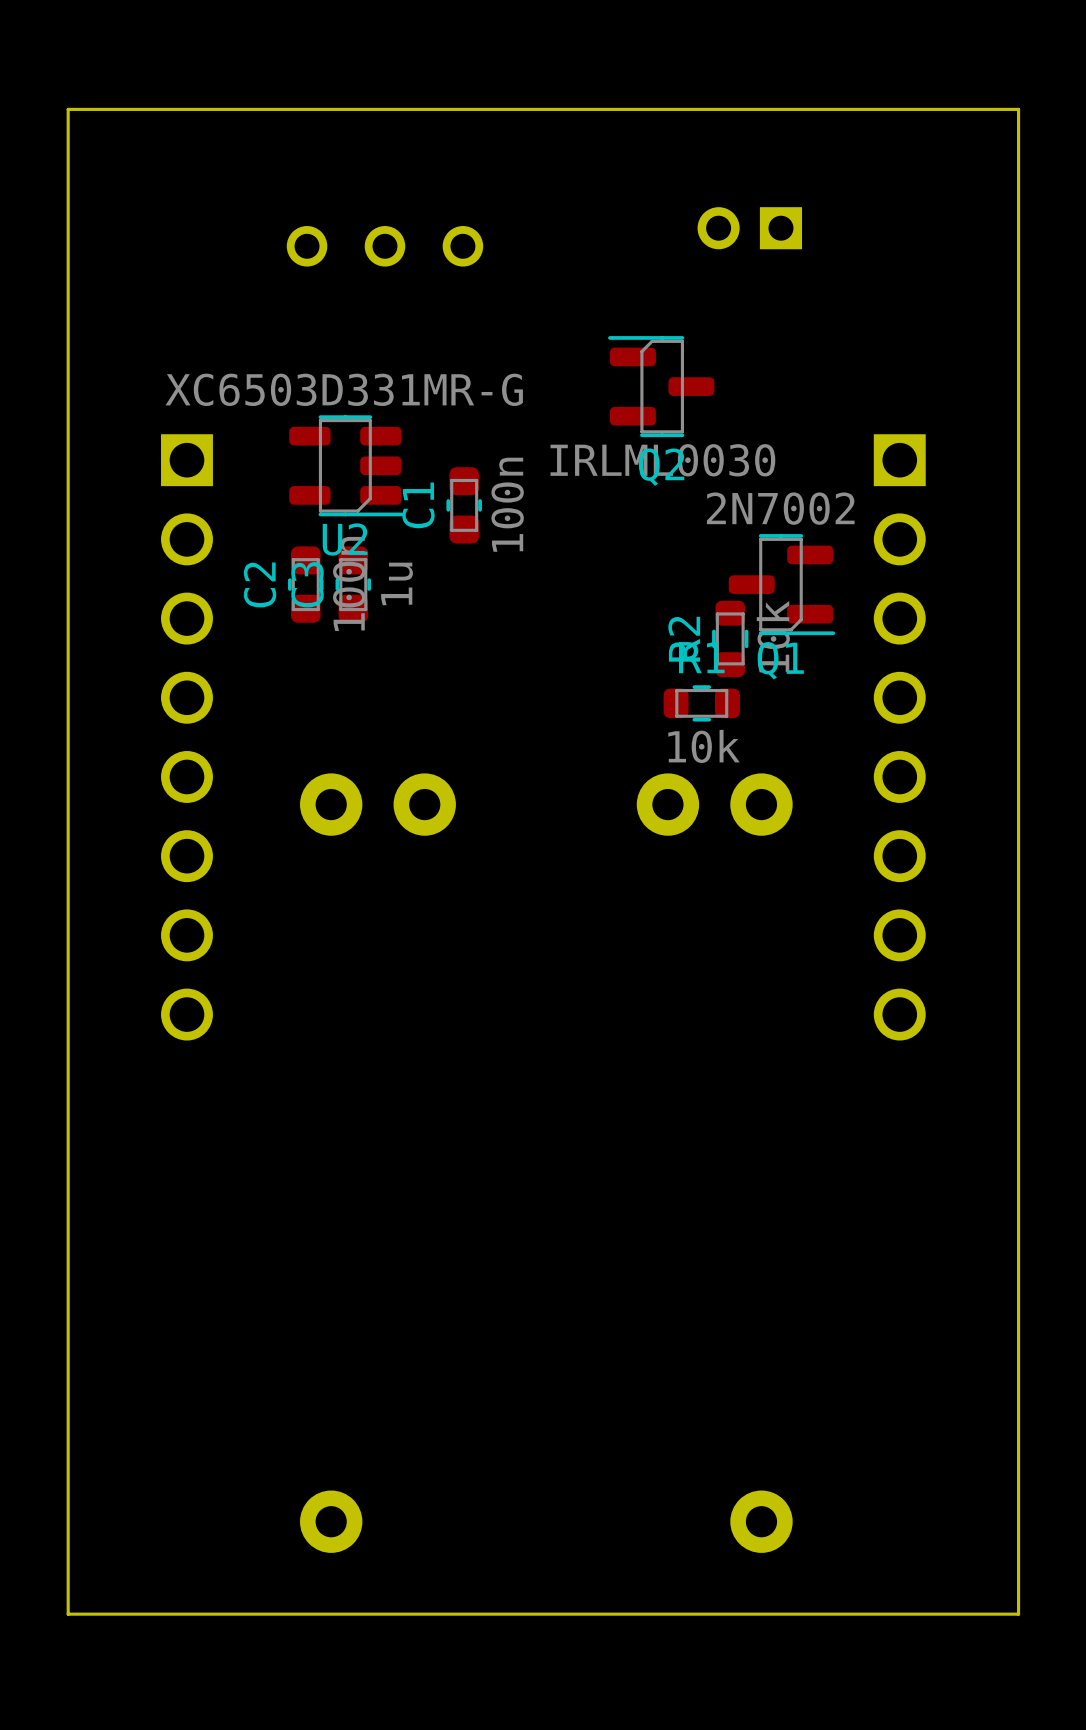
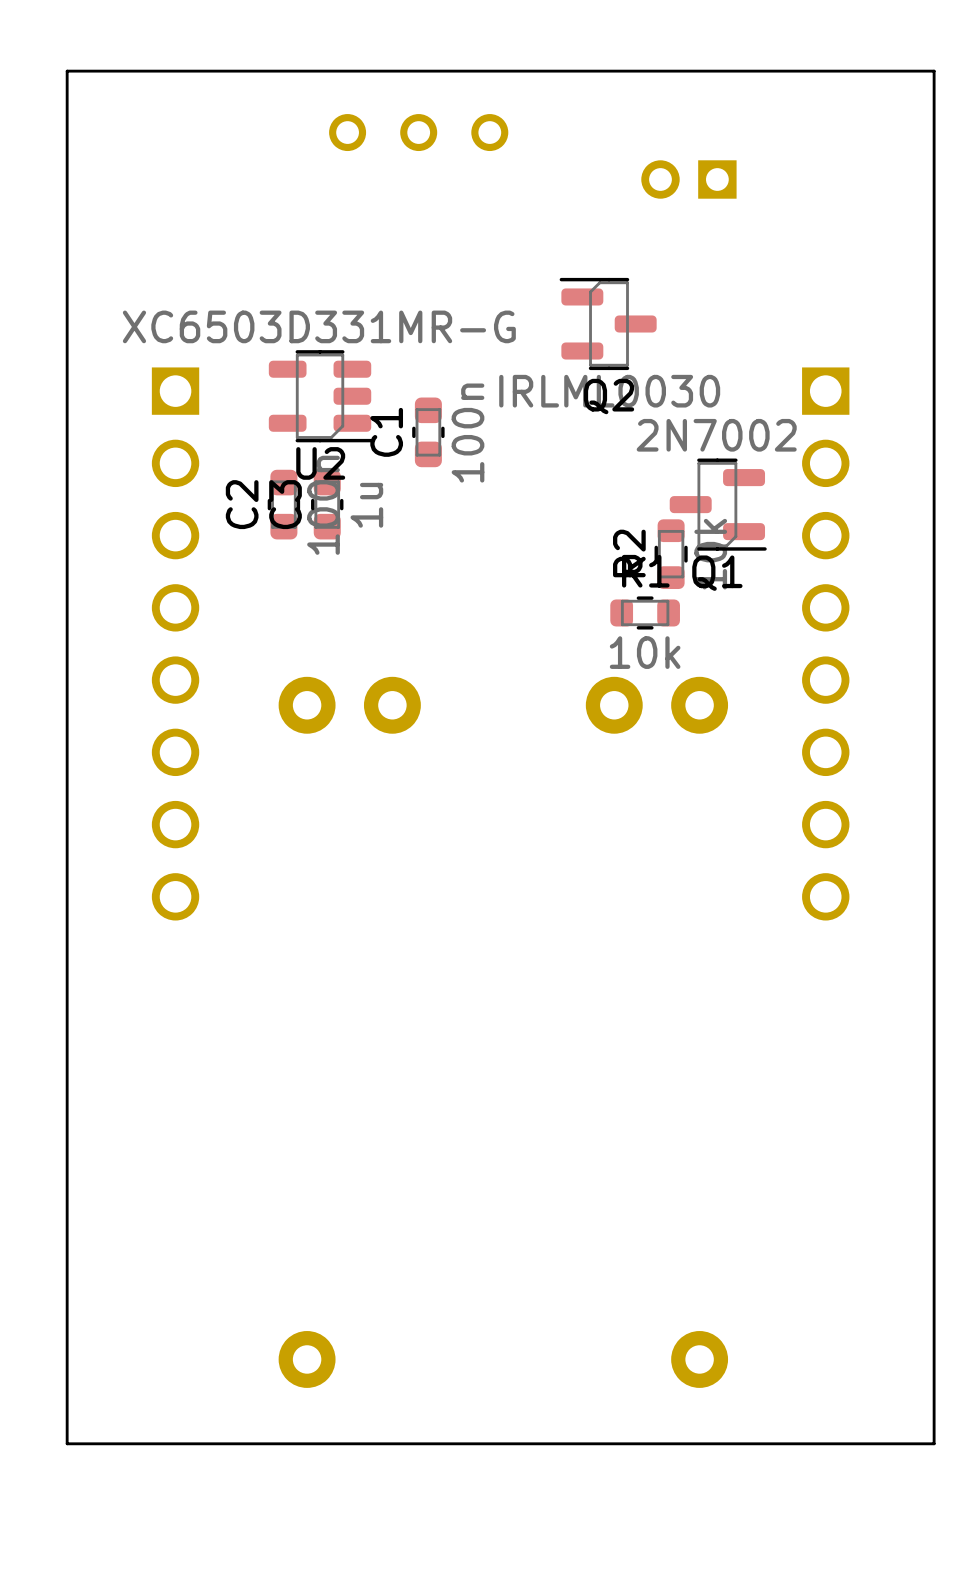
part position: (384, 246) -> (418, 132)

